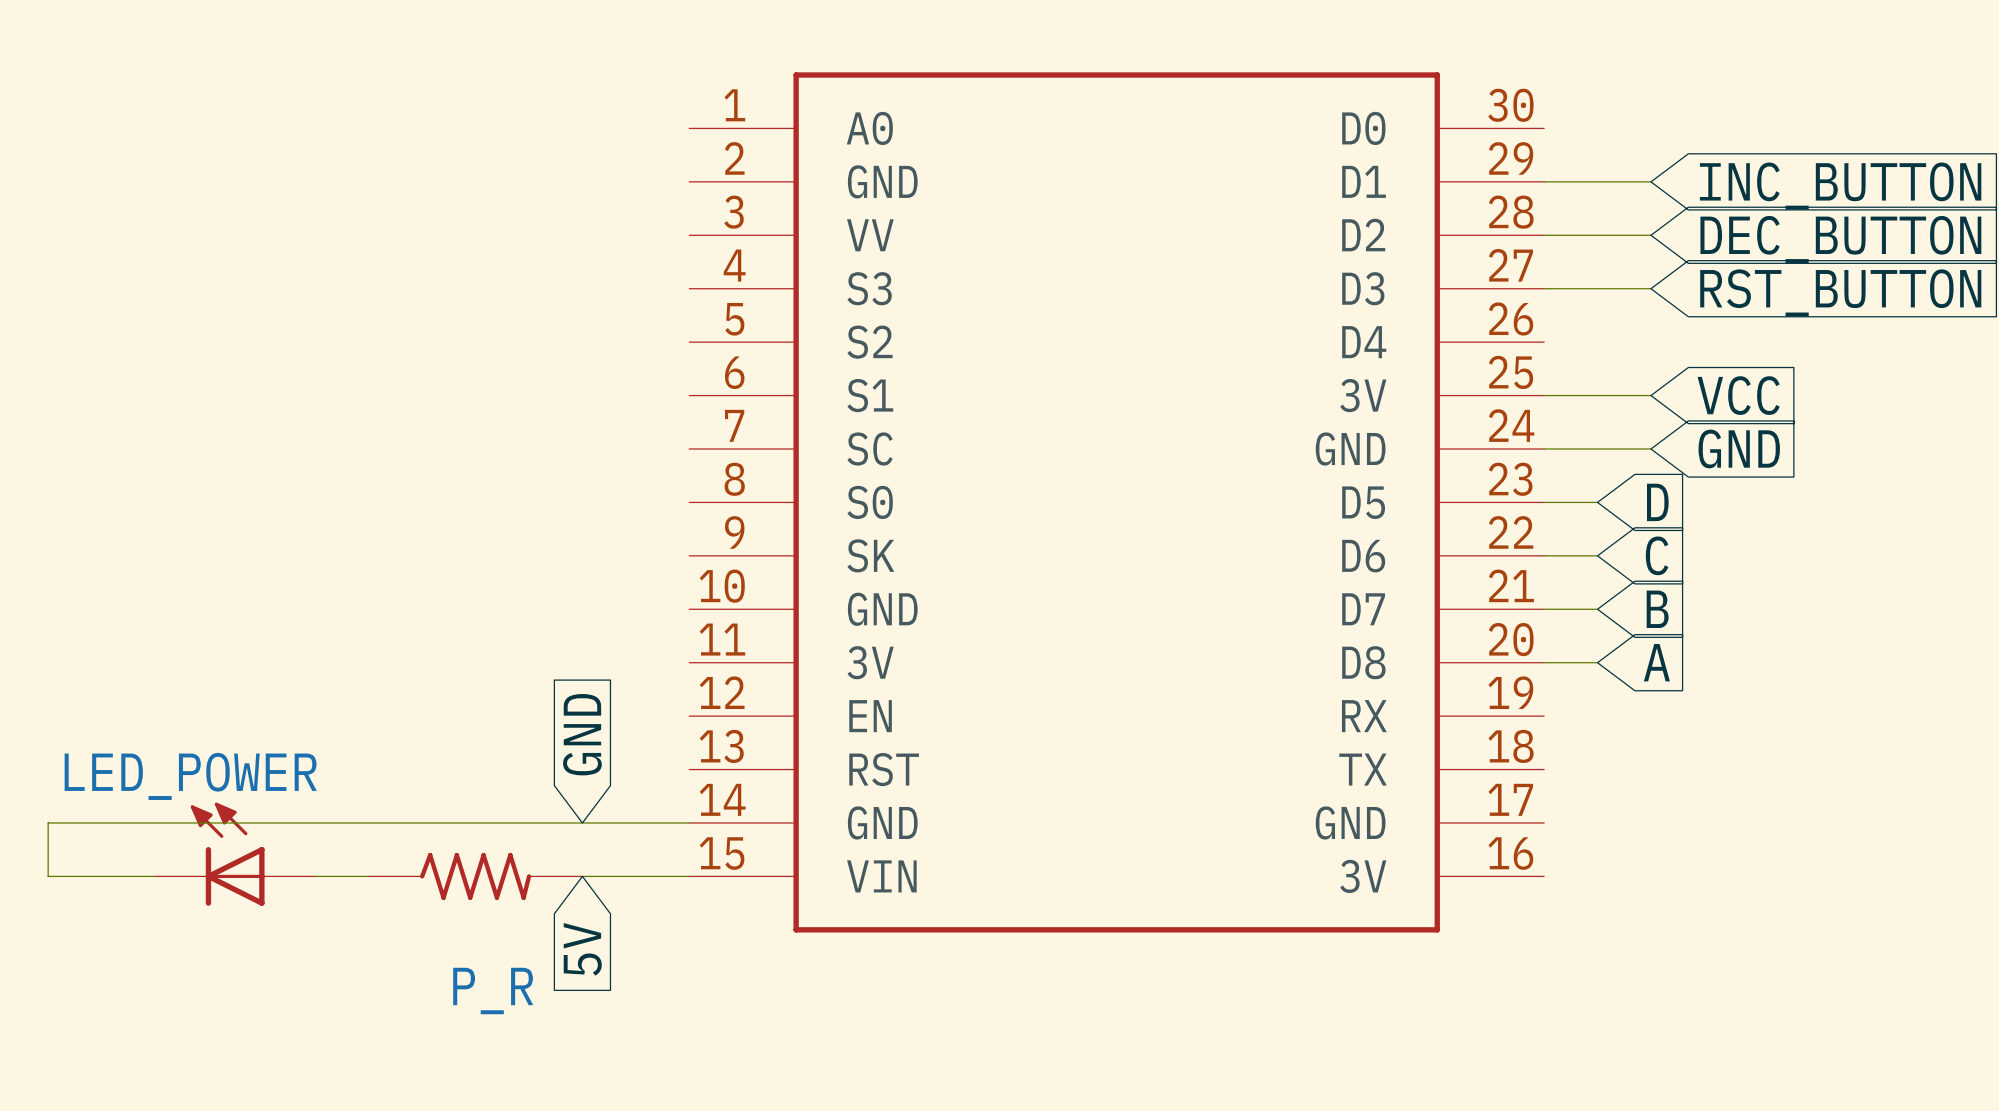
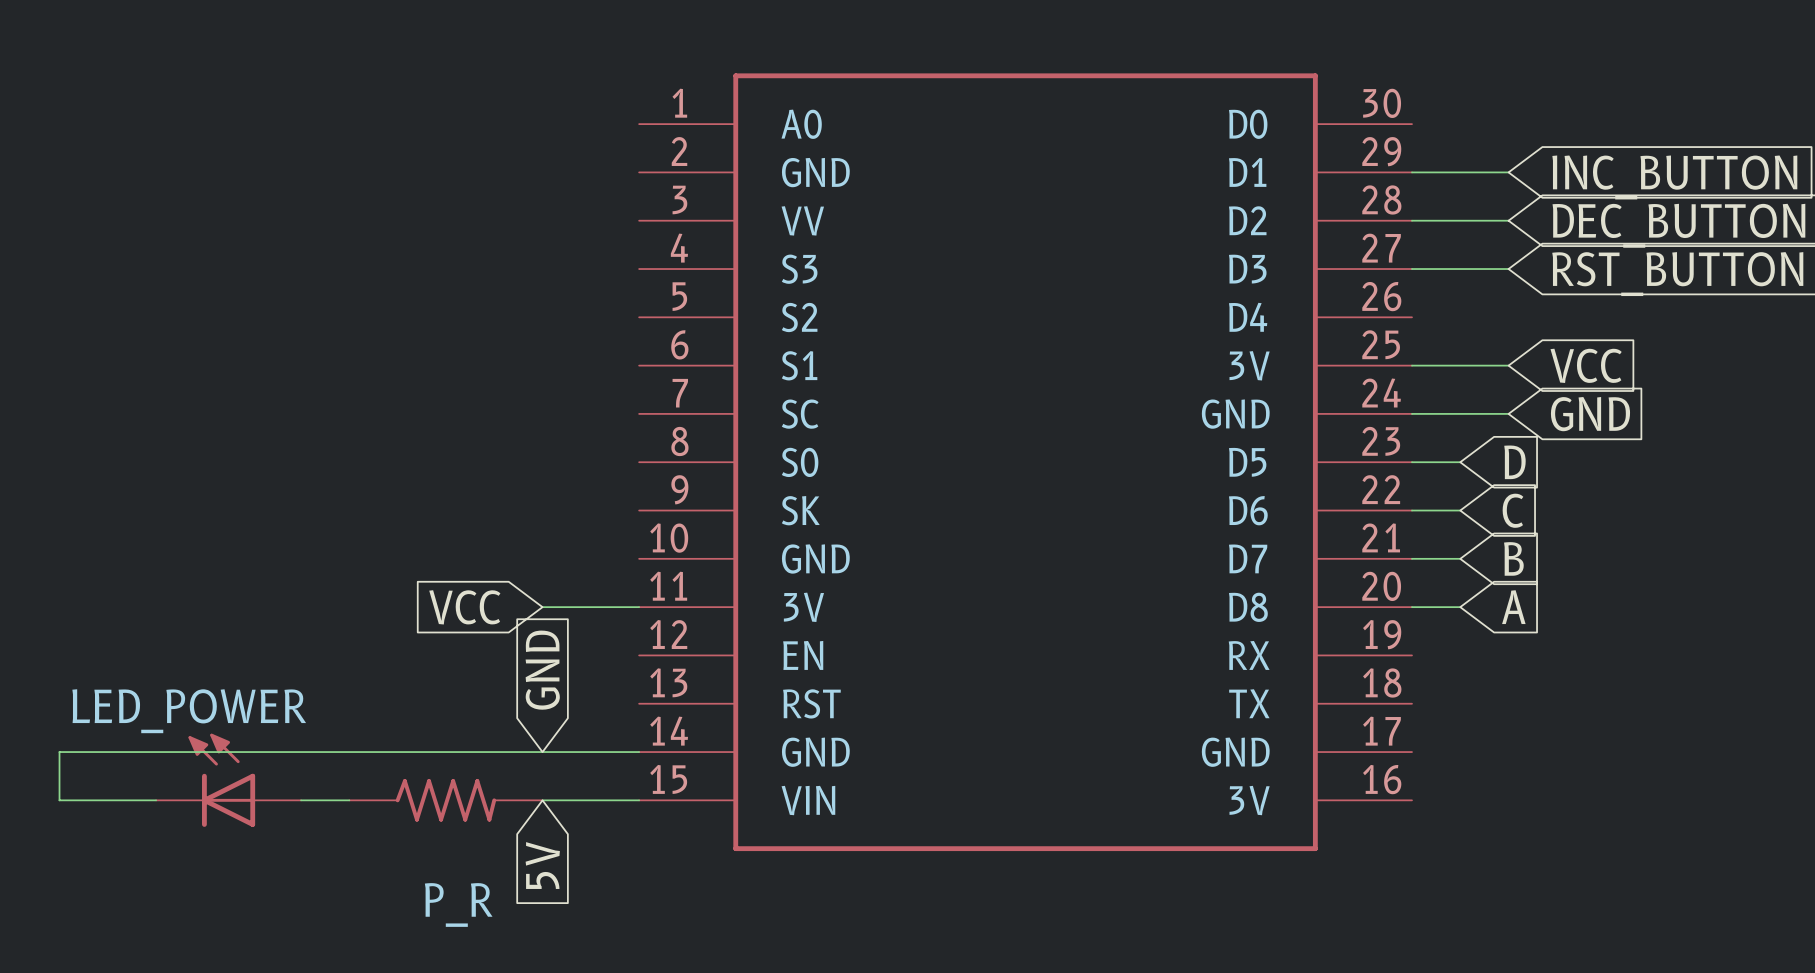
global label: none -> VCC (464, 607)
wire: none -> (542, 607) (639, 607)

